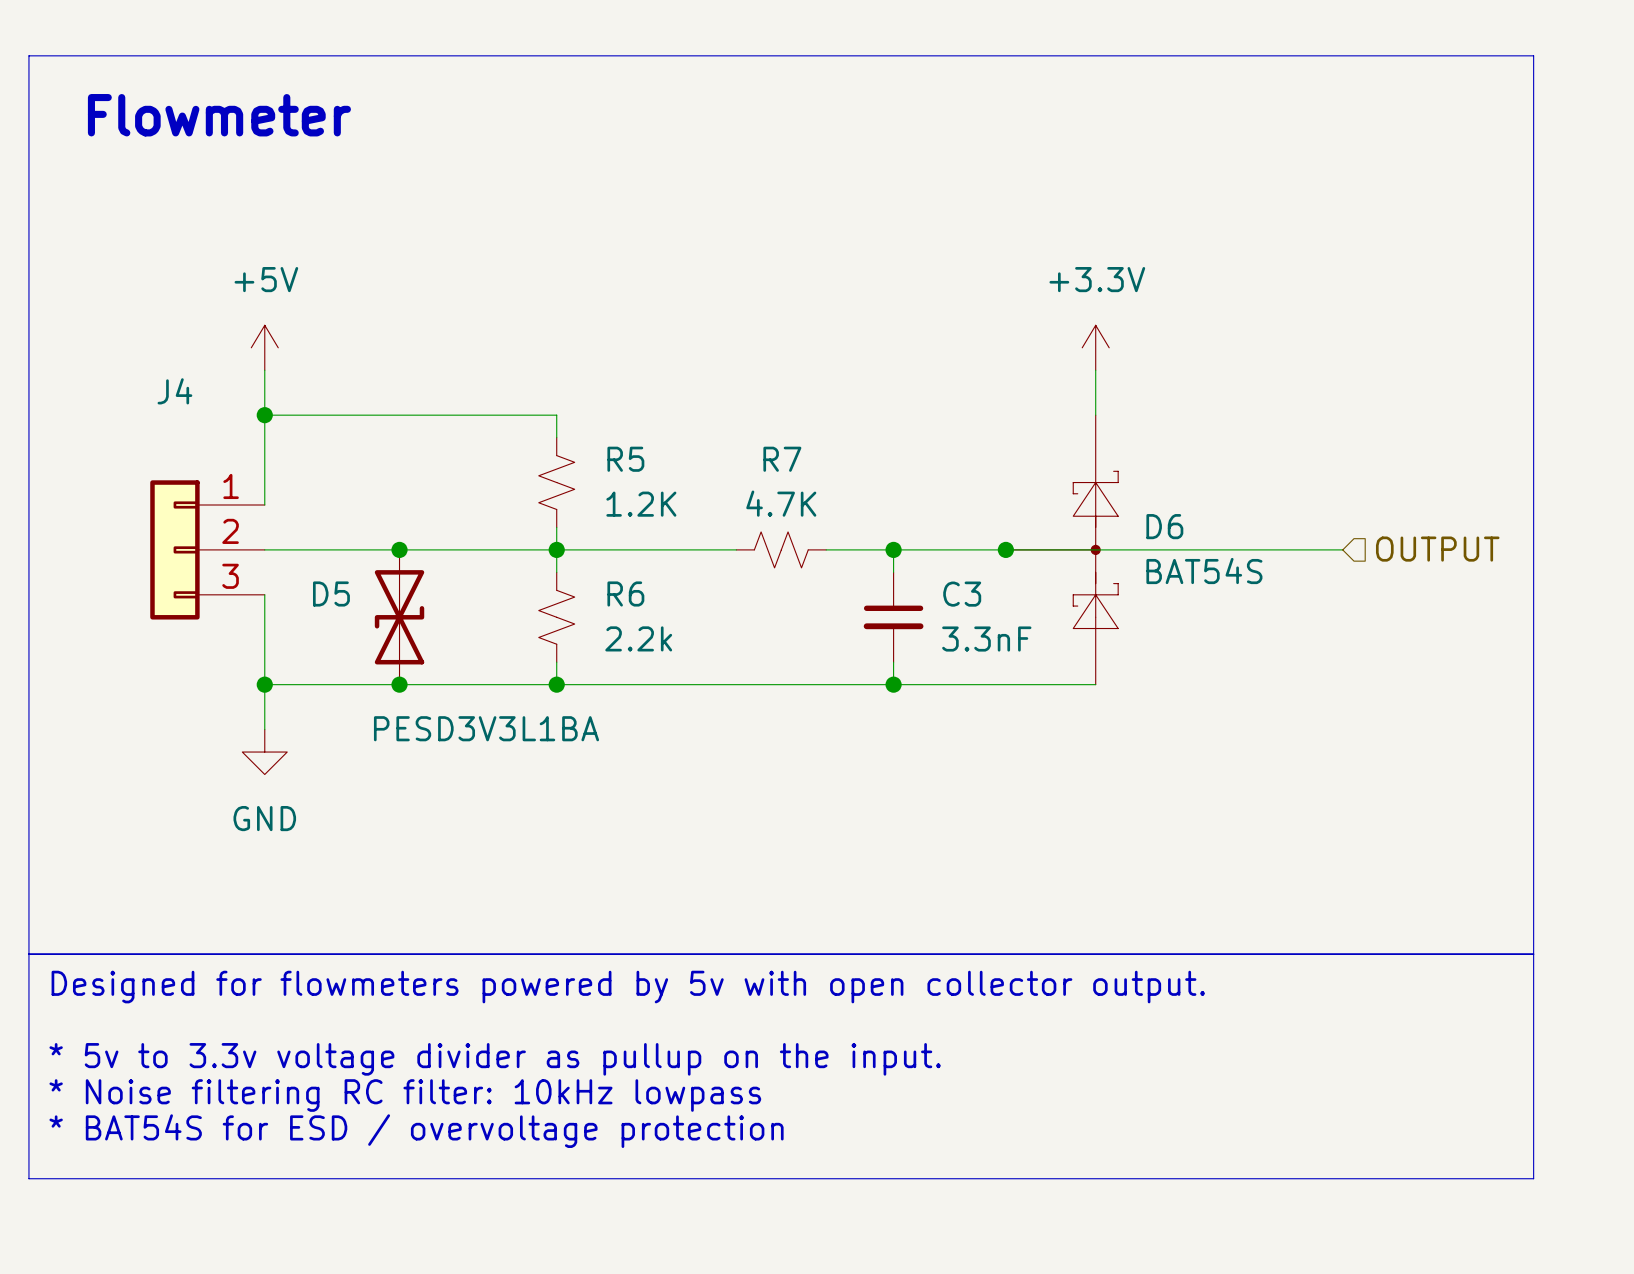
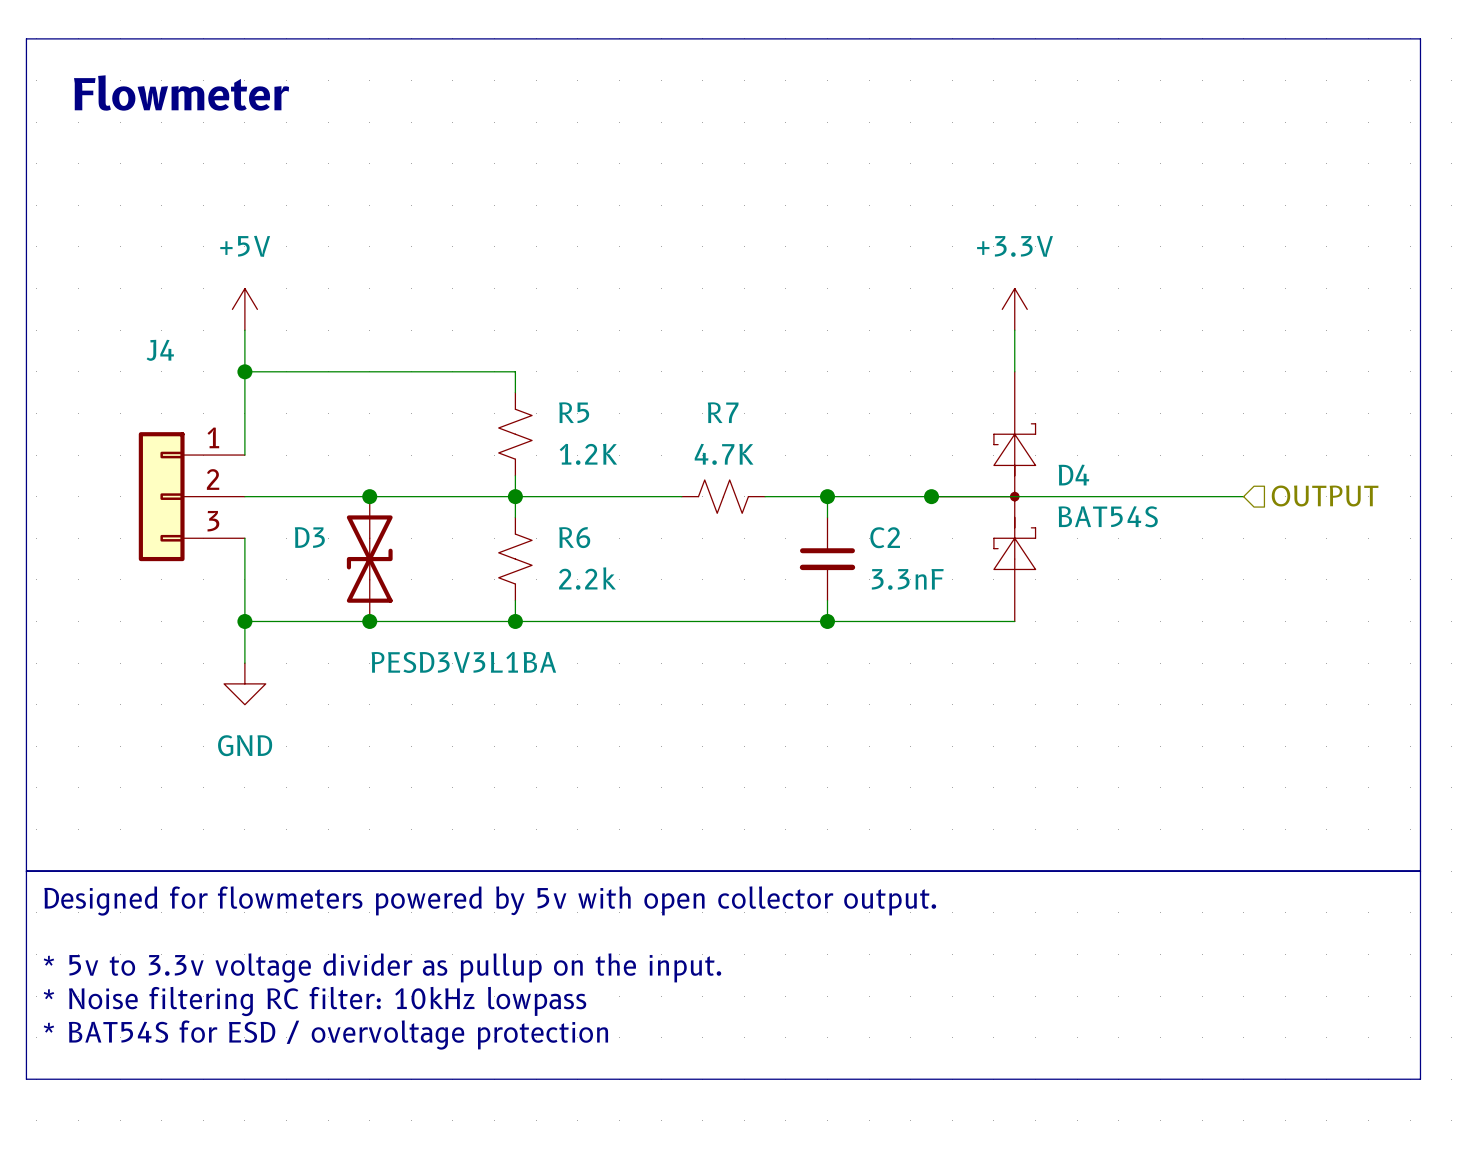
D6 name: D6 (1164, 526) -> D4 (1073, 475)
D5 name: D5 (331, 593) -> D3 (309, 537)
C3 name: C3 (962, 594) -> C2 (885, 537)

